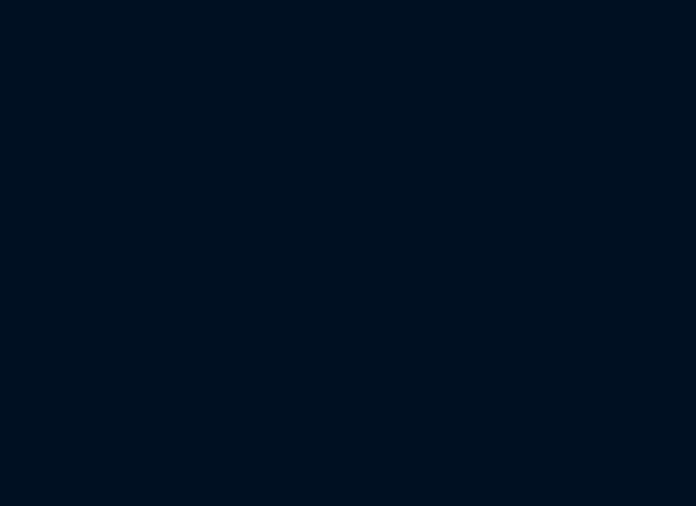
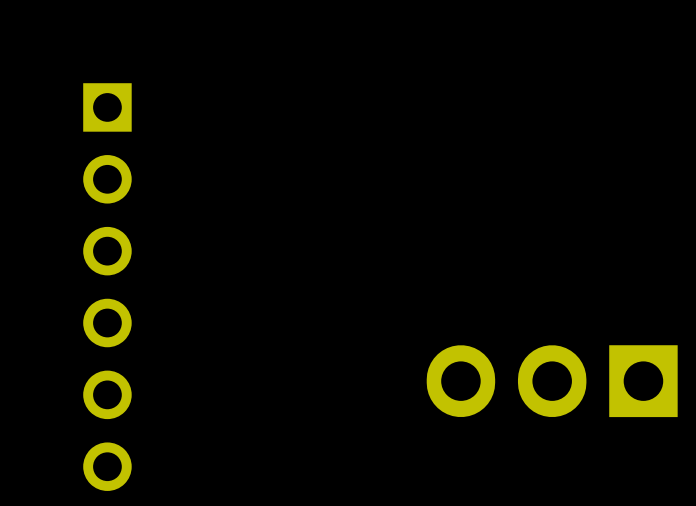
part: none -> (107, 287)
part: none -> (552, 381)

